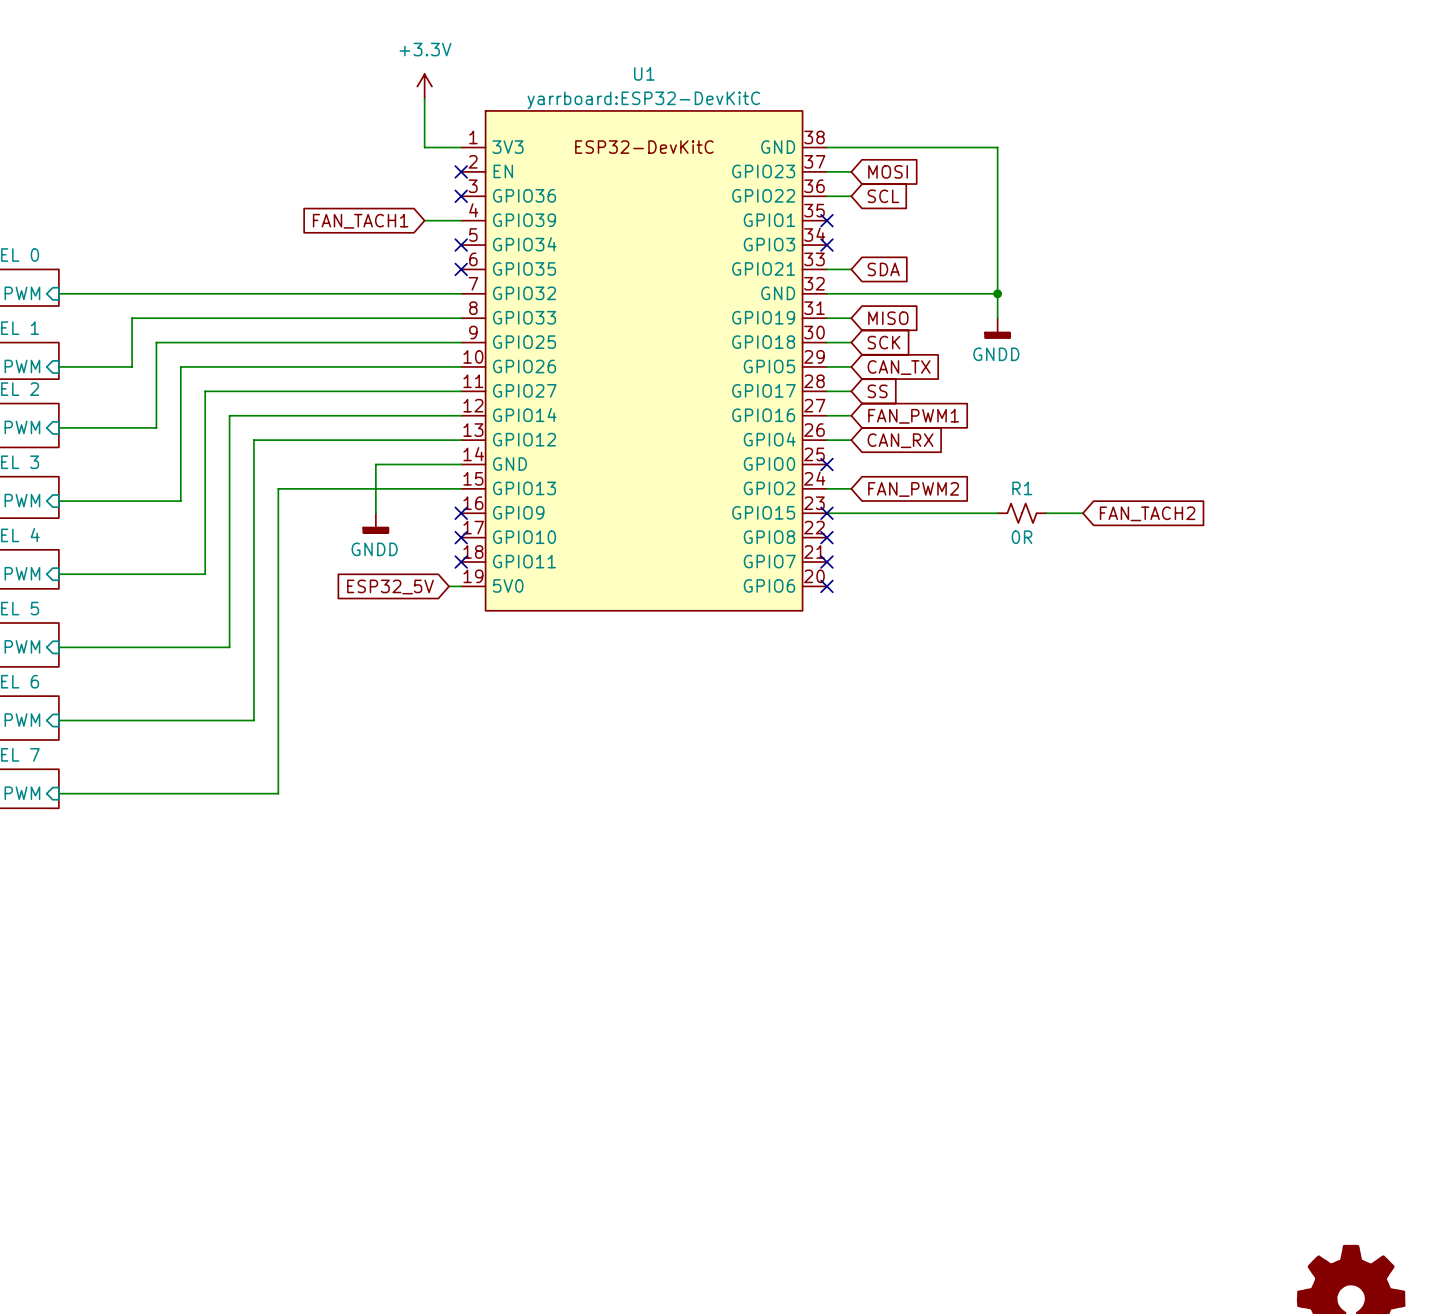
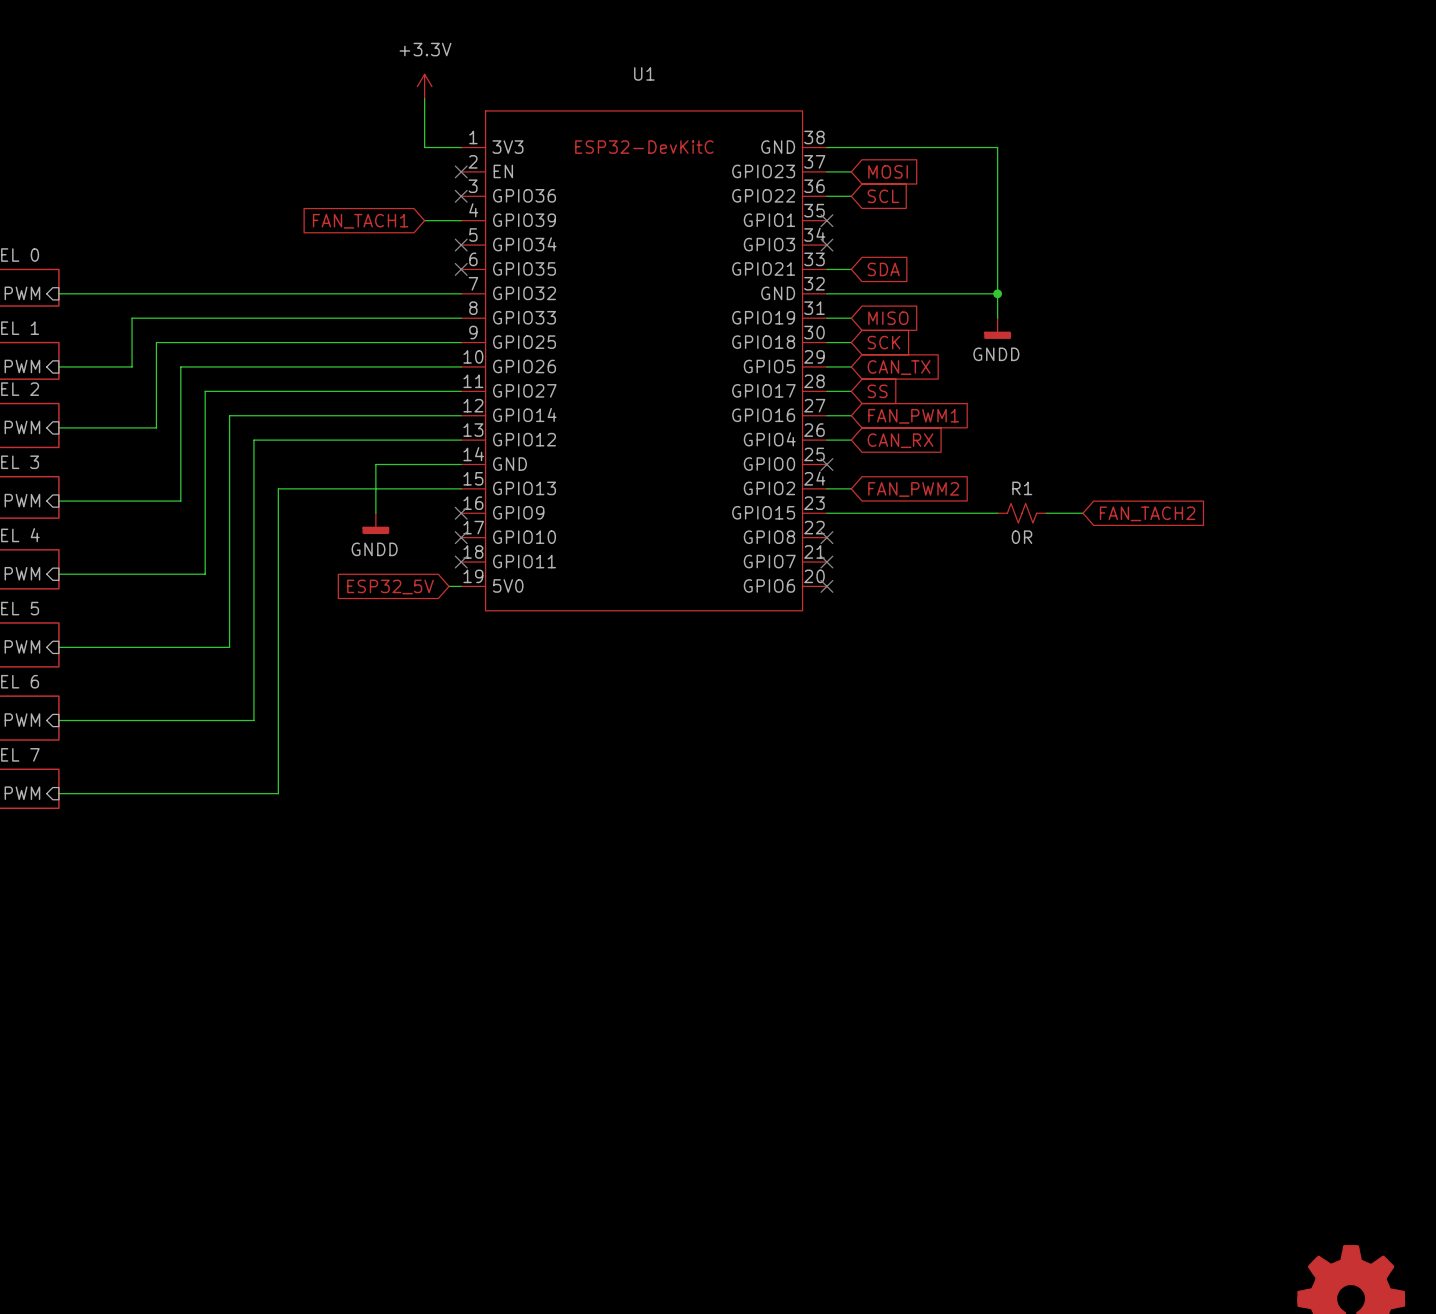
U1 text: yarrboard:ESP32-DevKitC (643, 100) -> none
no-connect mark: (826, 513) -> none

